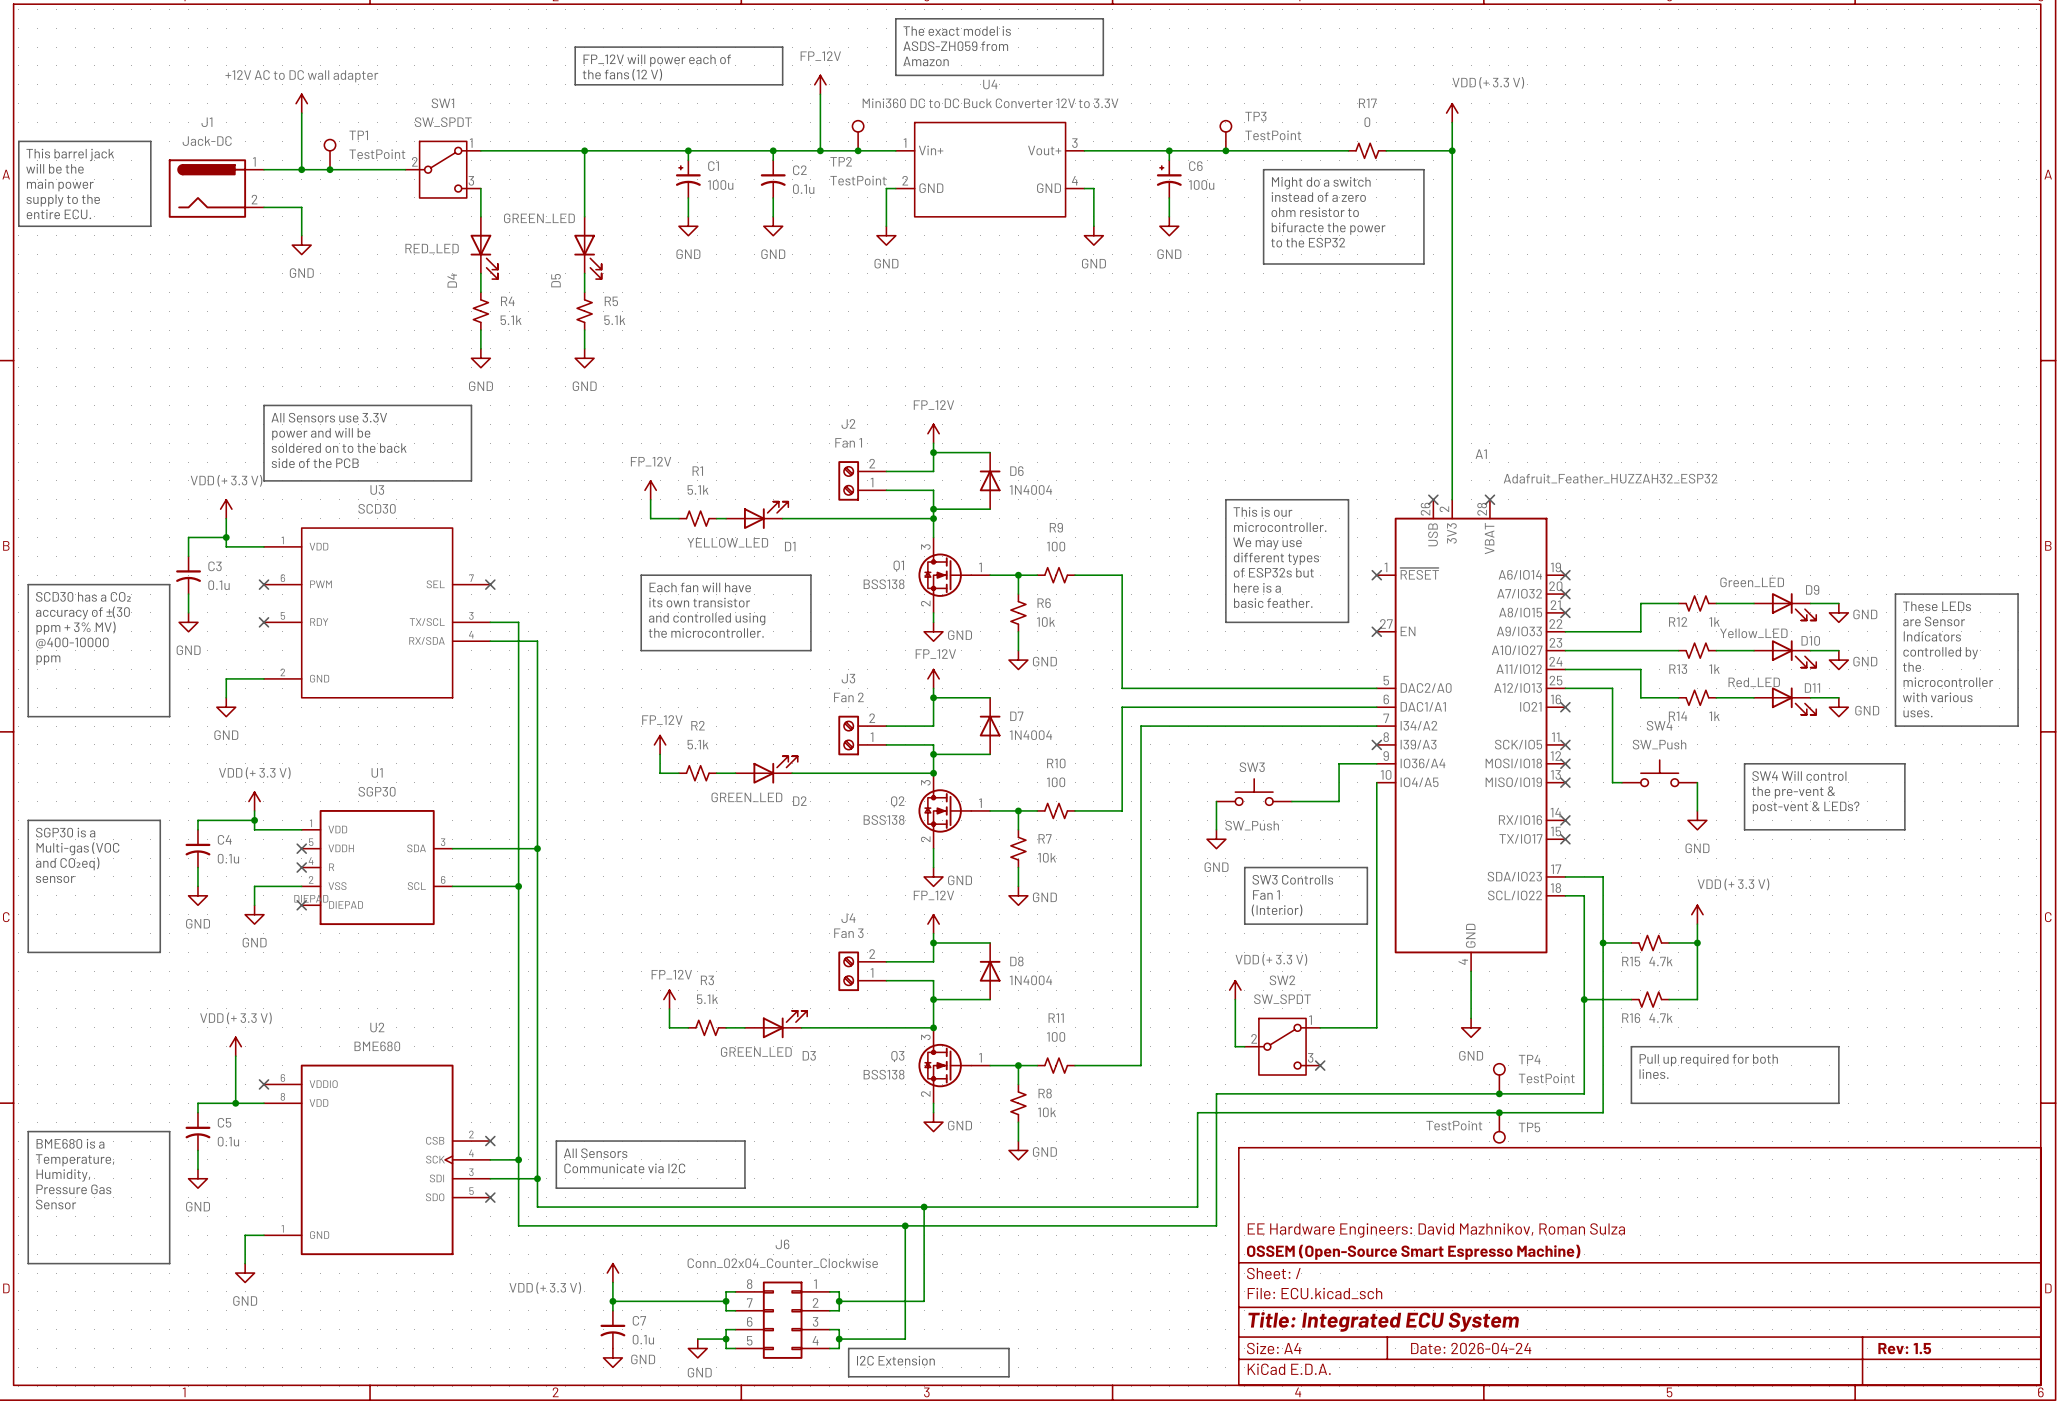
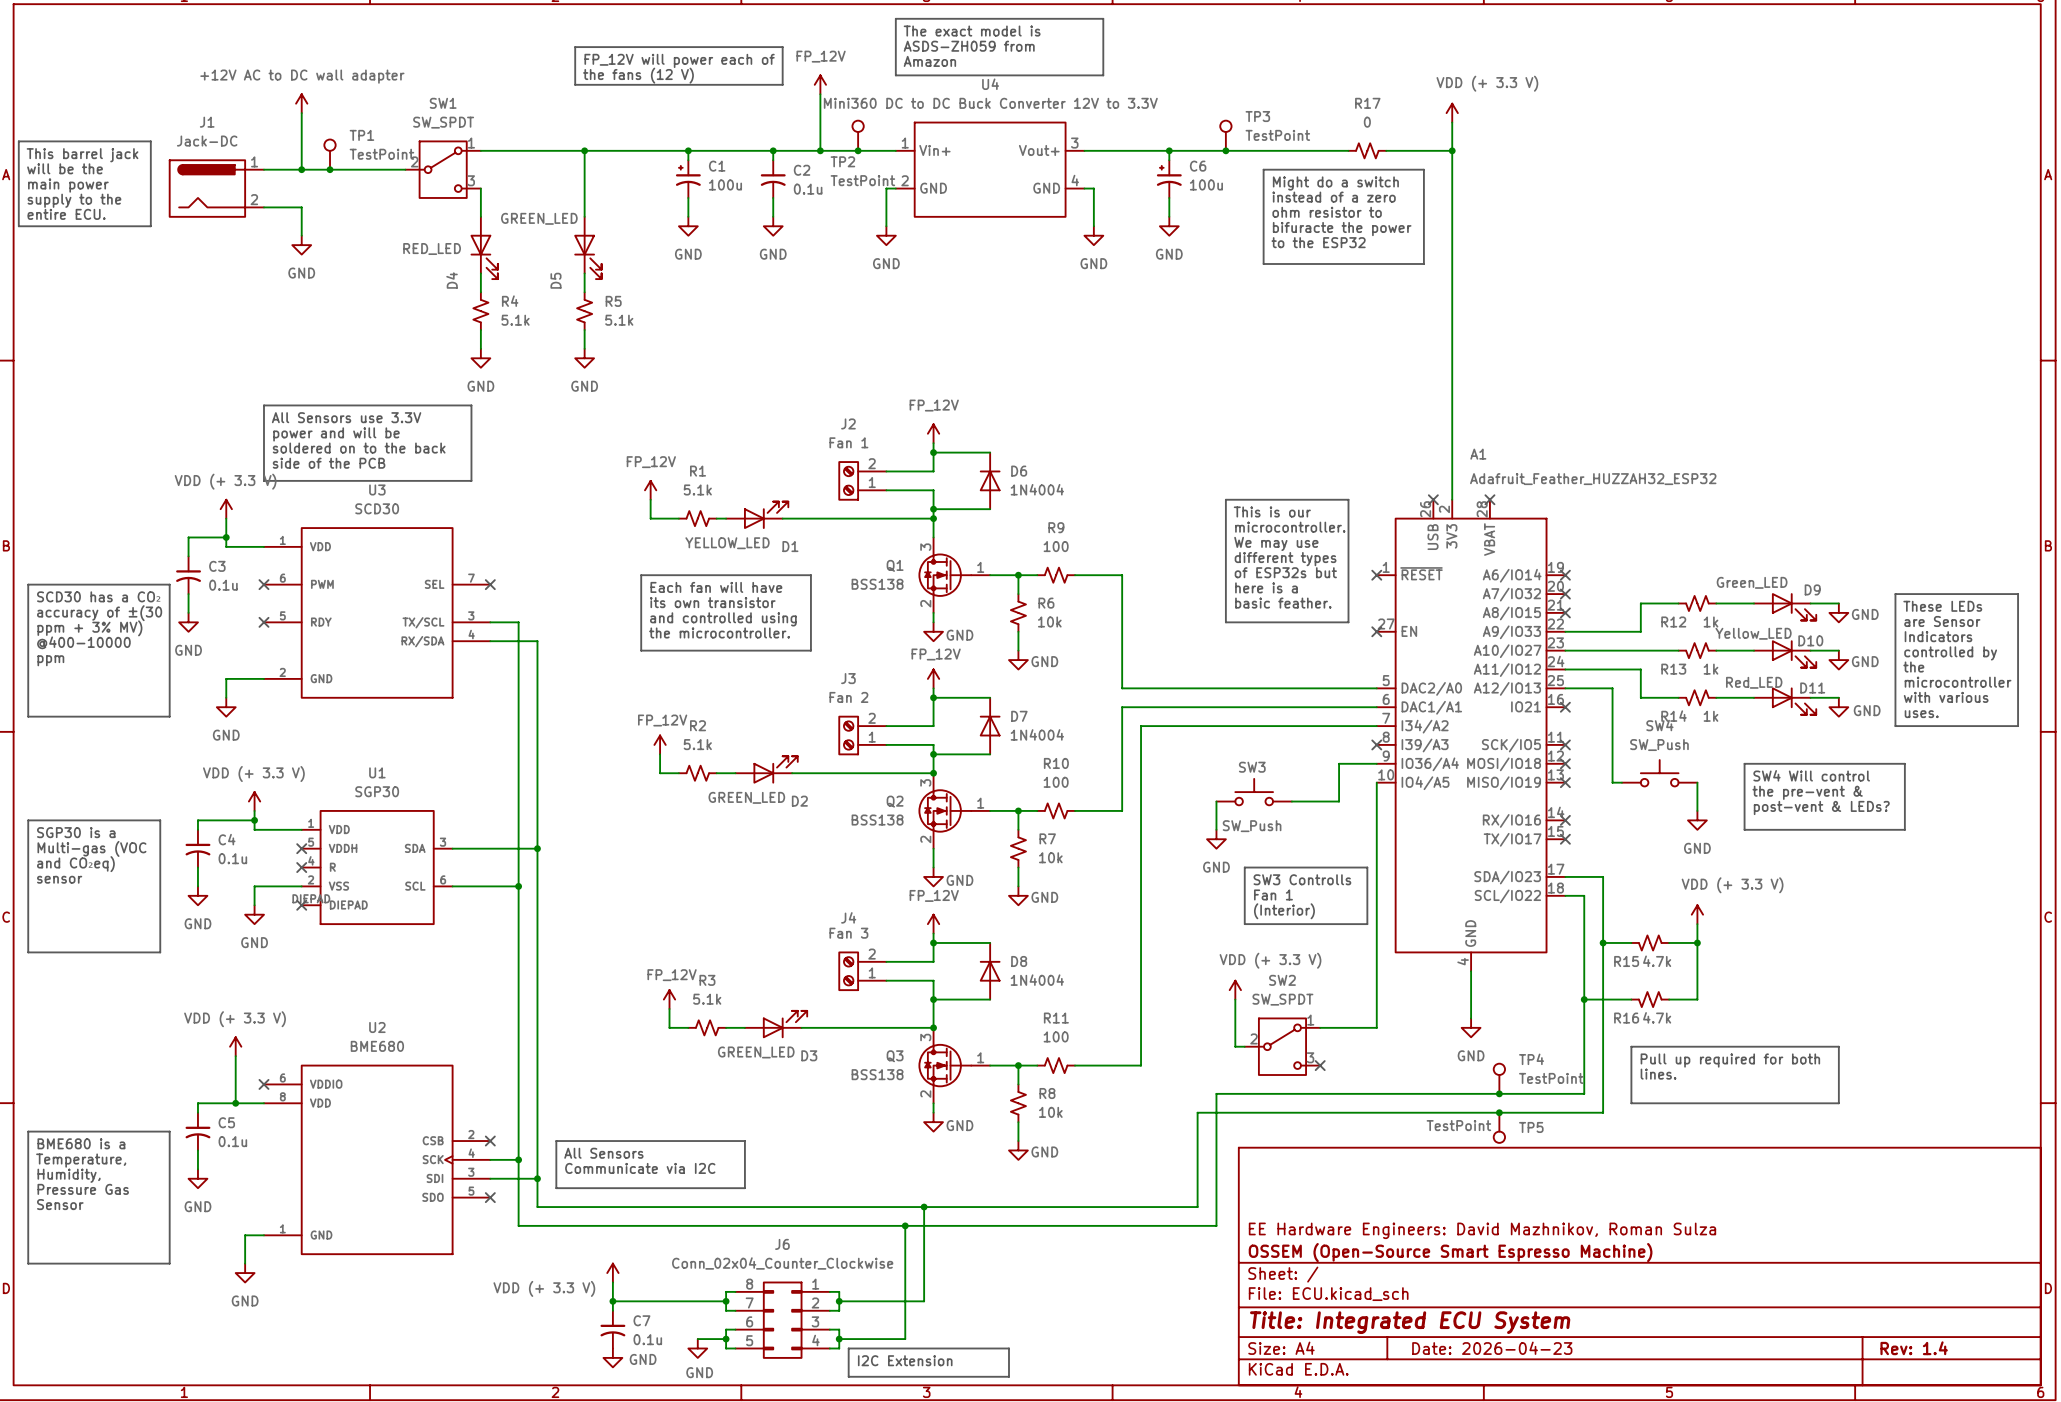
title block: Date: 2026-04-24 (1471, 1348) -> Date: 2026-04-23 (1492, 1348)
title block: Rev: 1.5 (1904, 1348) -> Rev: 1.4 (1914, 1348)

